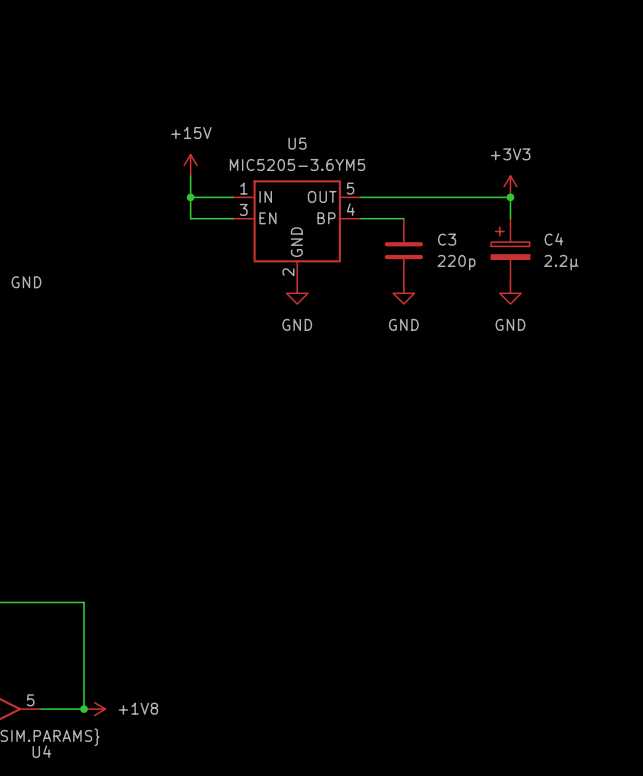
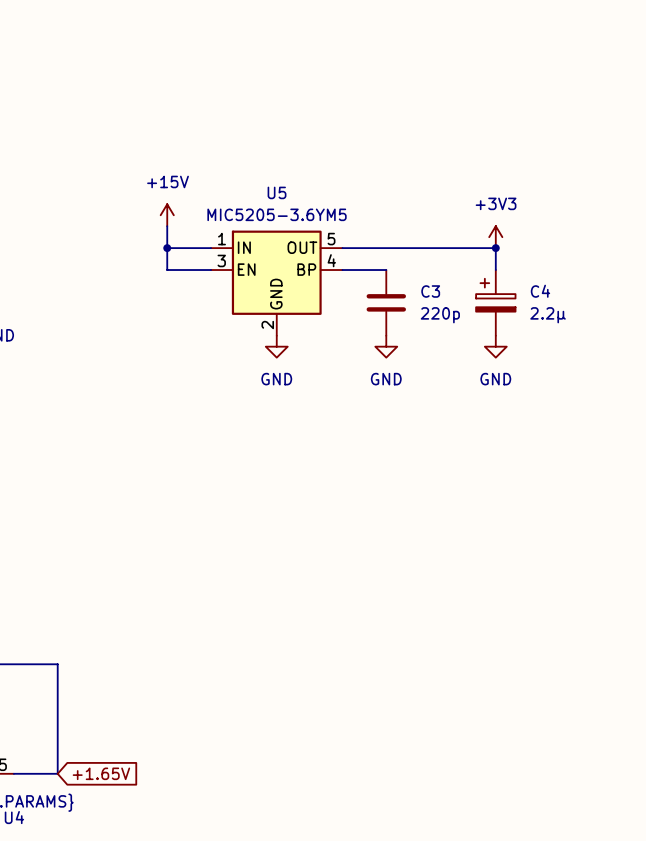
junction: (84, 709) -> none
power symbol: +1V8 (94, 709) -> none
global label: none -> +1.65V (101, 773)

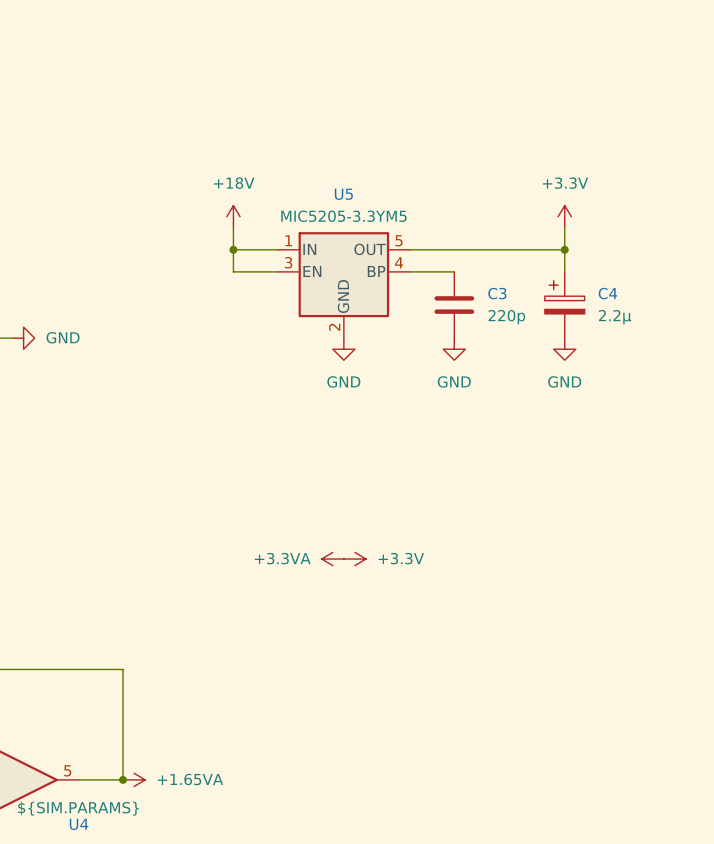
U5 value: MIC5205-3.6YM5 (277, 214) -> MIC5205-3.3YM5 (343, 216)
power symbol: +15V (167, 215) -> +18V (233, 216)
power symbol: none -> +3.3V (564, 216)
power symbol: +3V3 (495, 237) -> none
power symbol: none -> +3.3VA (332, 559)
power symbol: none -> +3.3V (354, 559)
junction: none -> (123, 779)
power symbol: none -> +1.65VA (134, 779)
global label: +1.65V (101, 773) -> none

